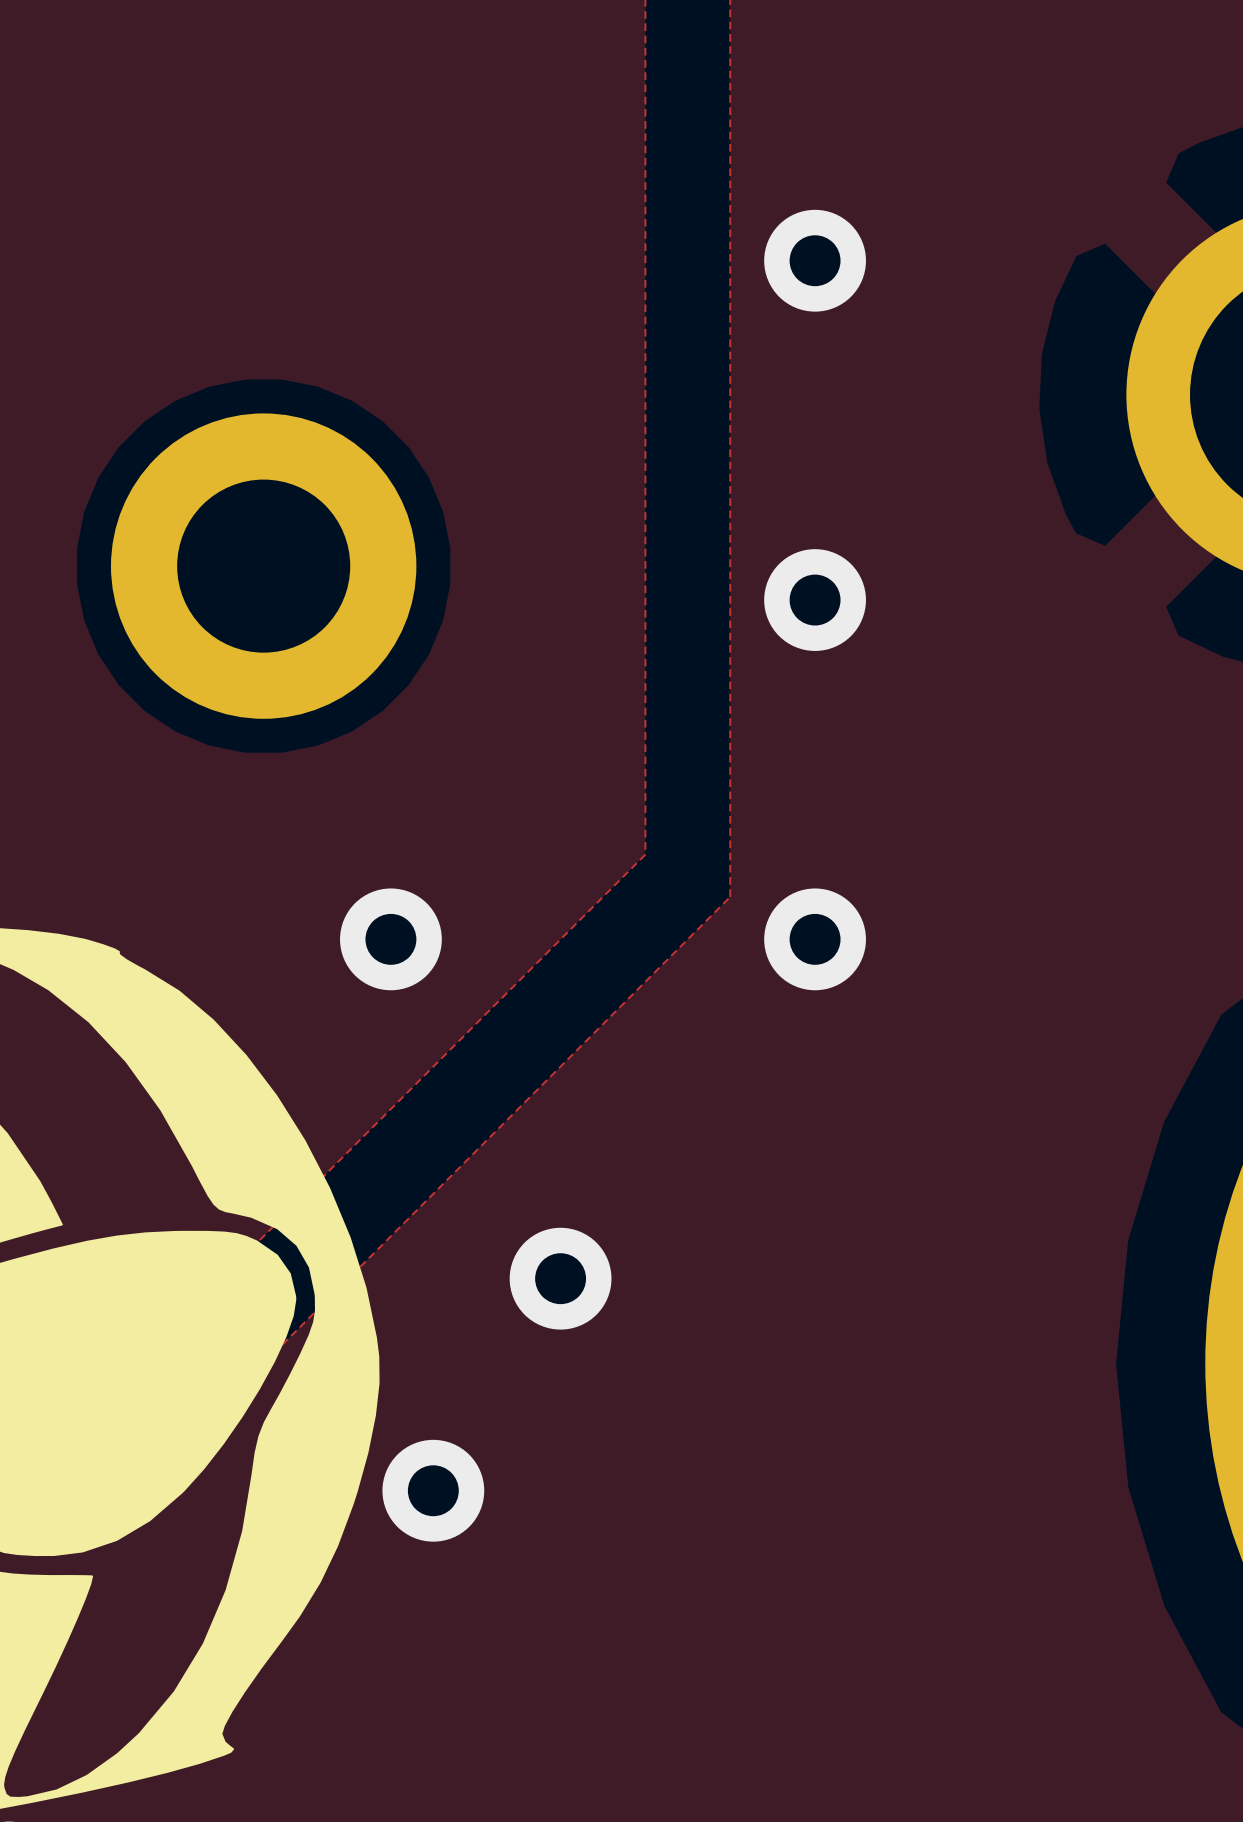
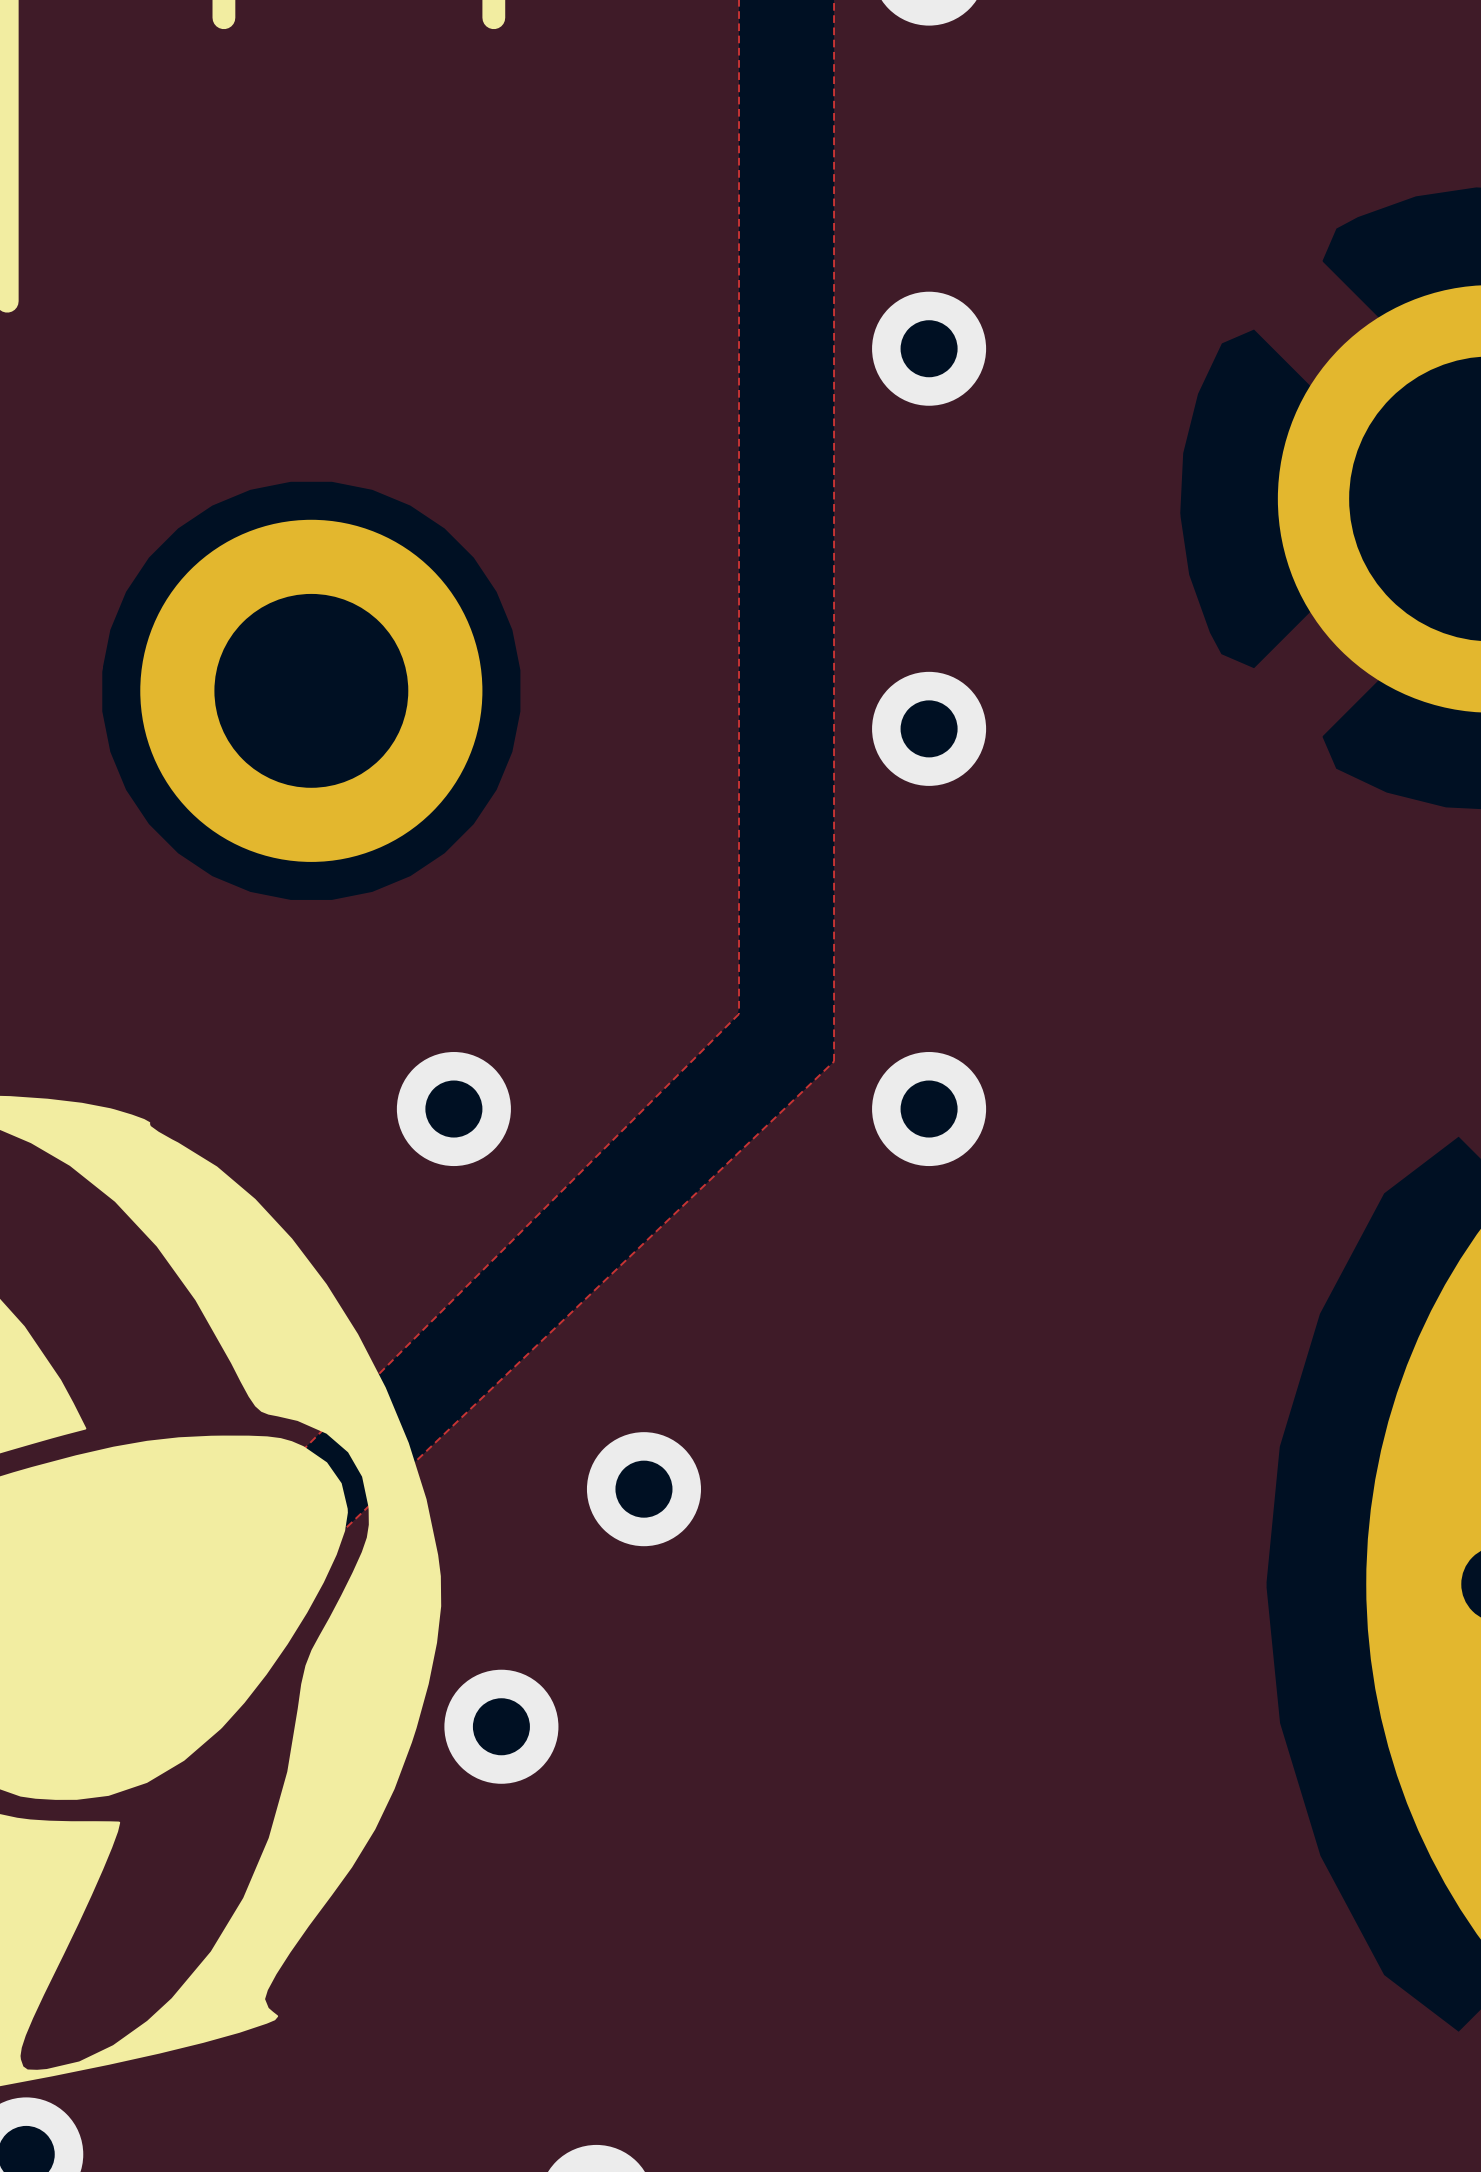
zone outline: (730, 896) (178, 1448) (153, 1448) -> (834, 1061) (187, 1679)

